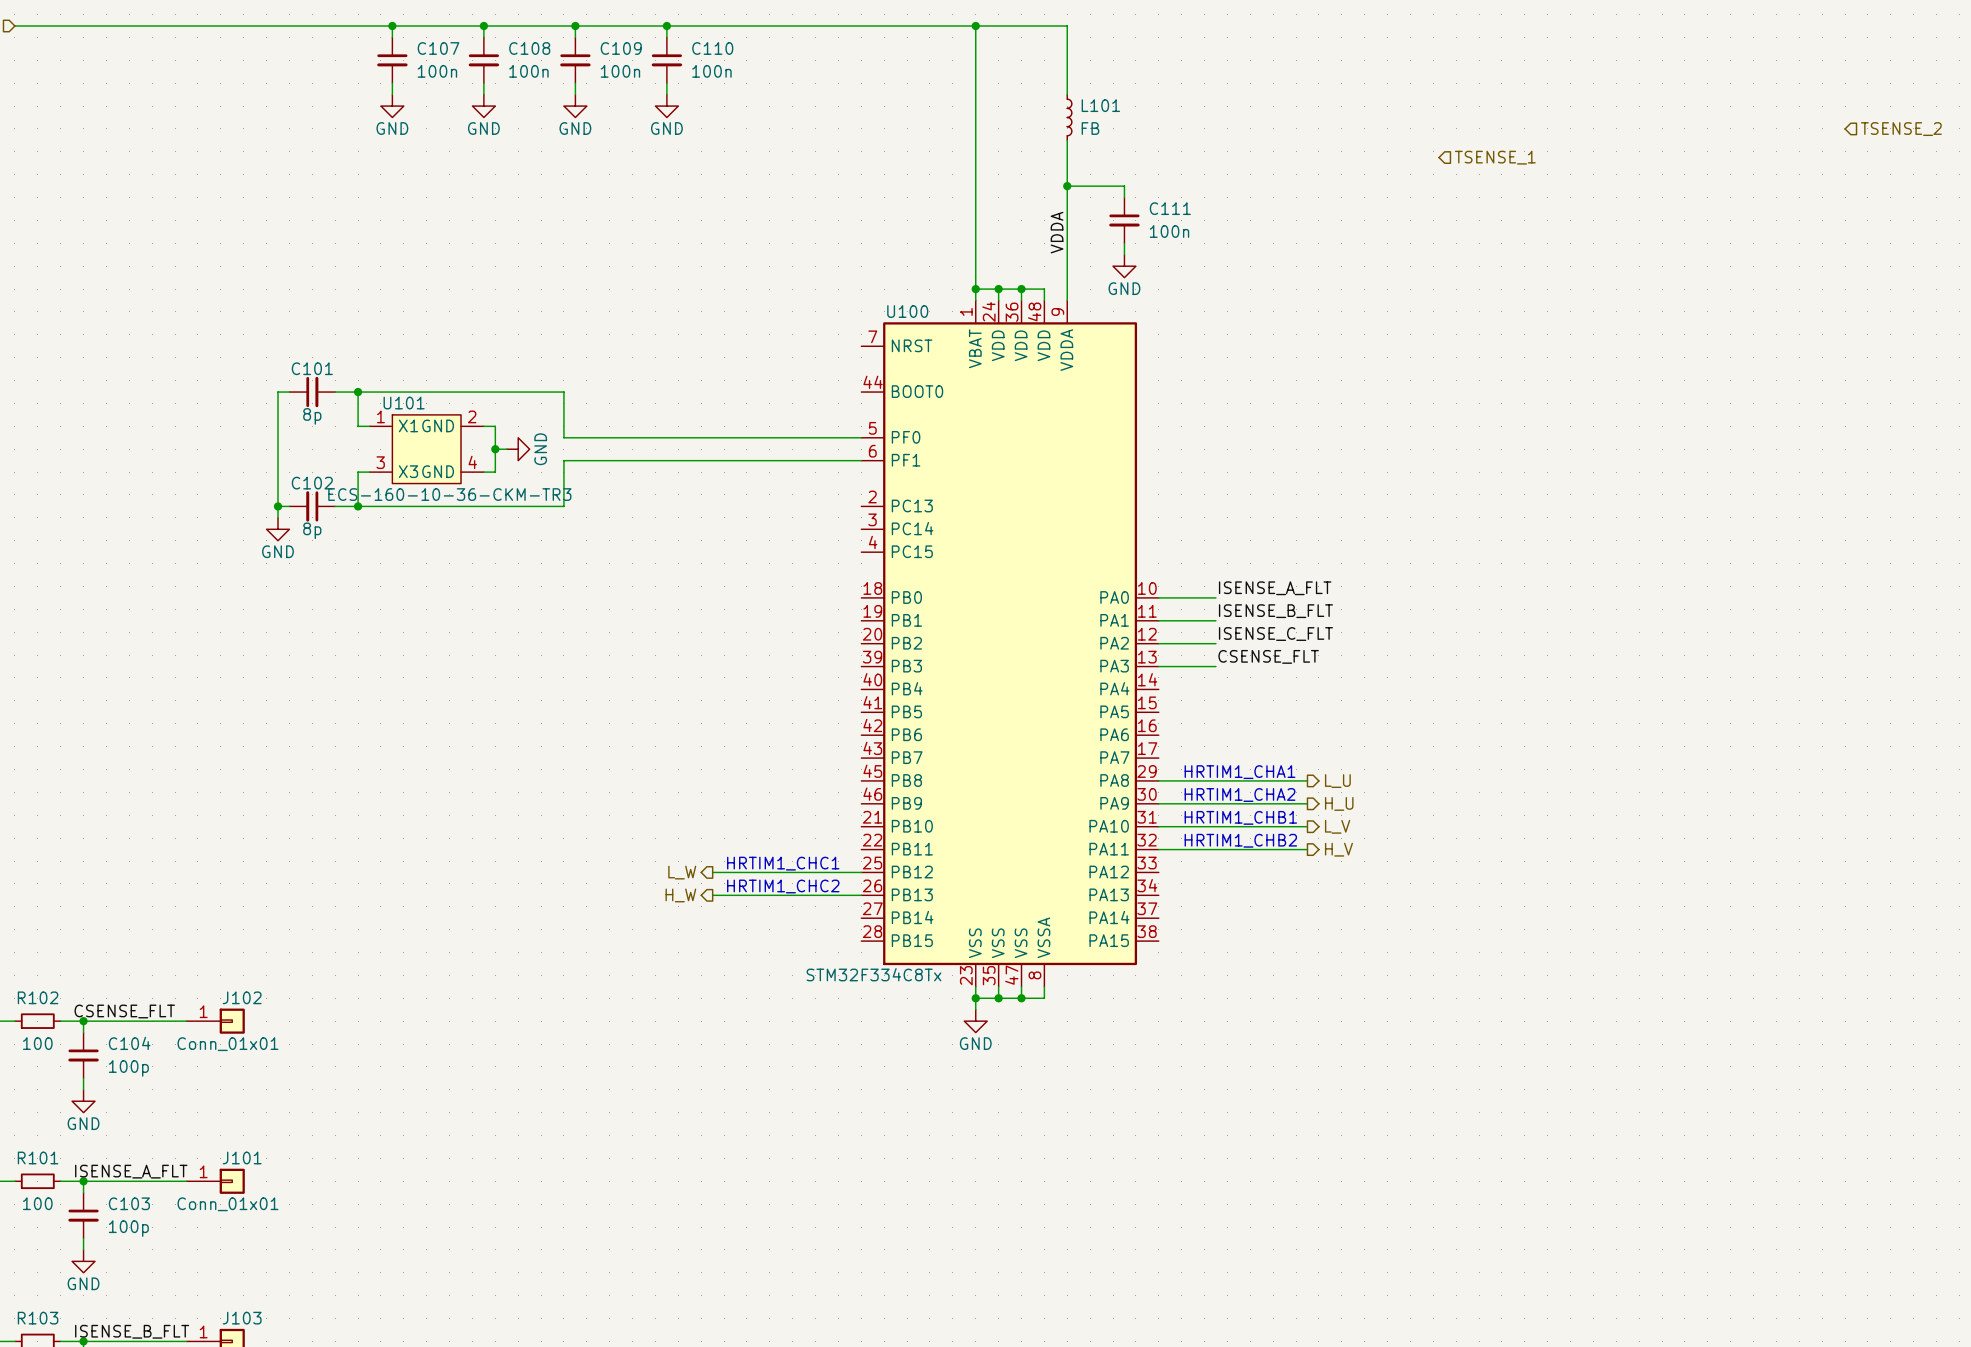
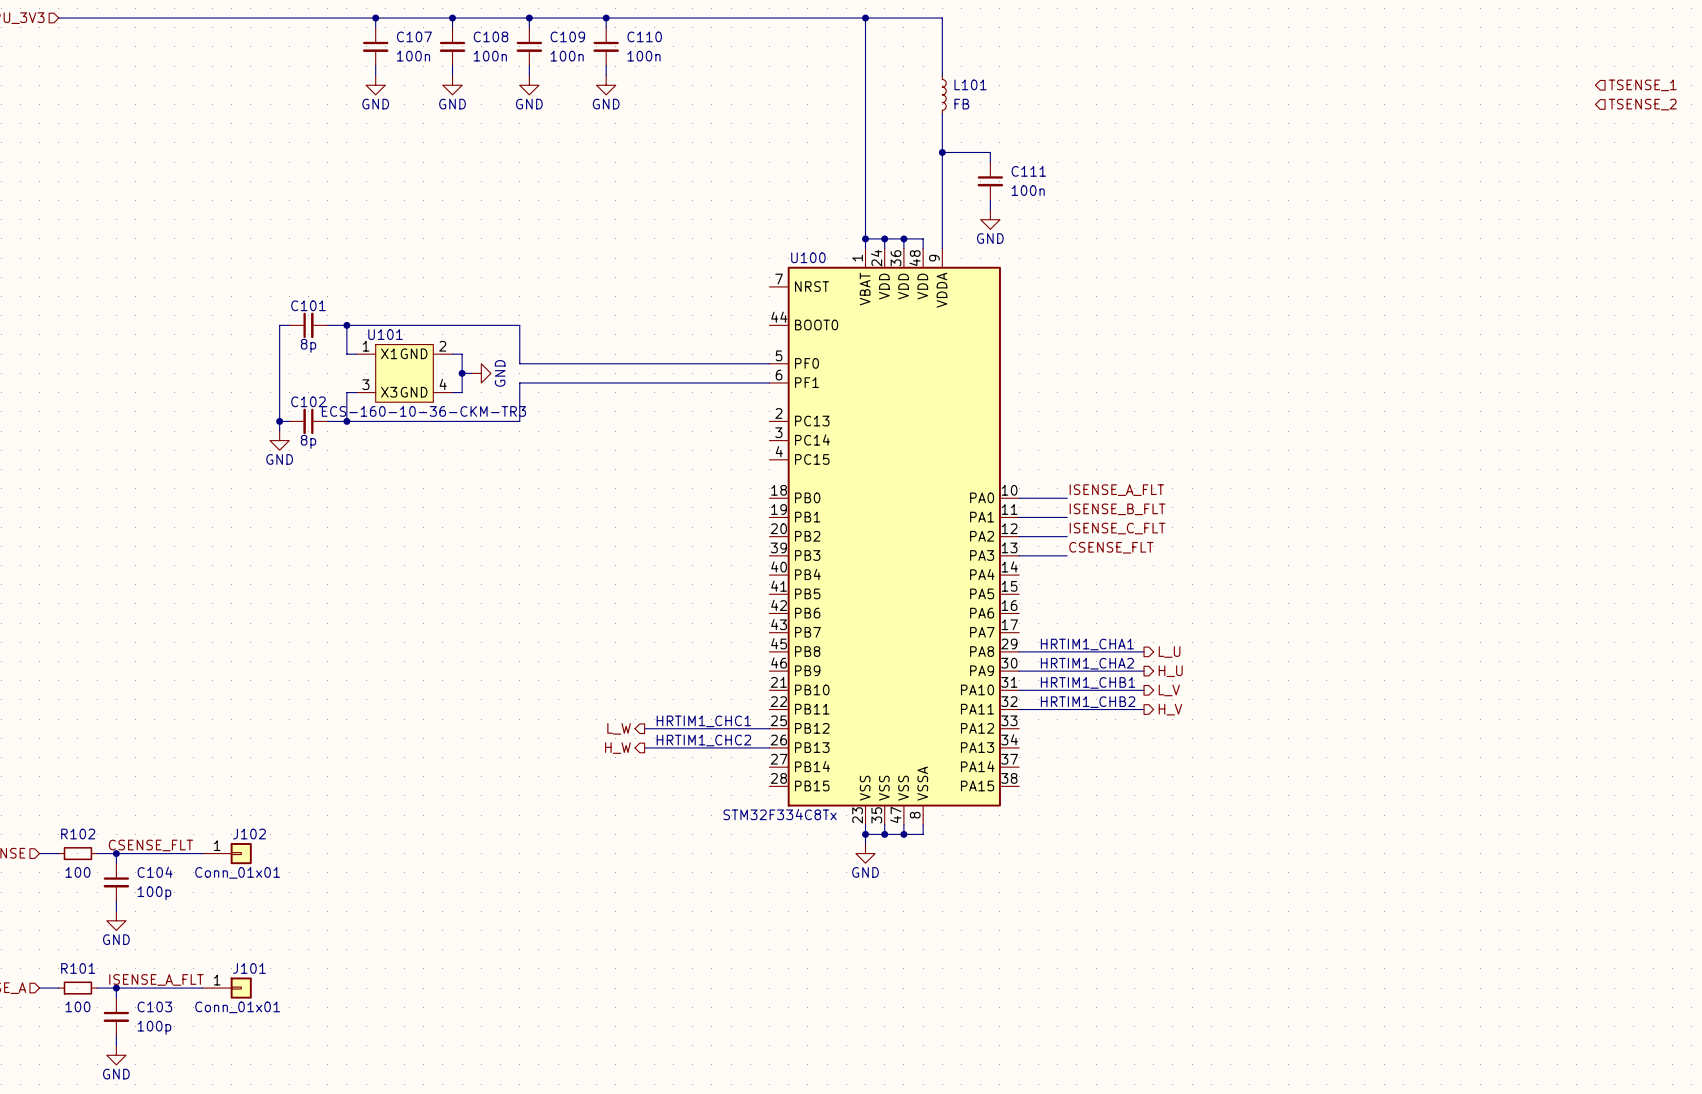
hierarchical label: none -> TSENSE_1 (1642, 85)
hierarchical label: TSENSE_1 (1495, 157) -> none
label: VDDA (1057, 232) -> none

